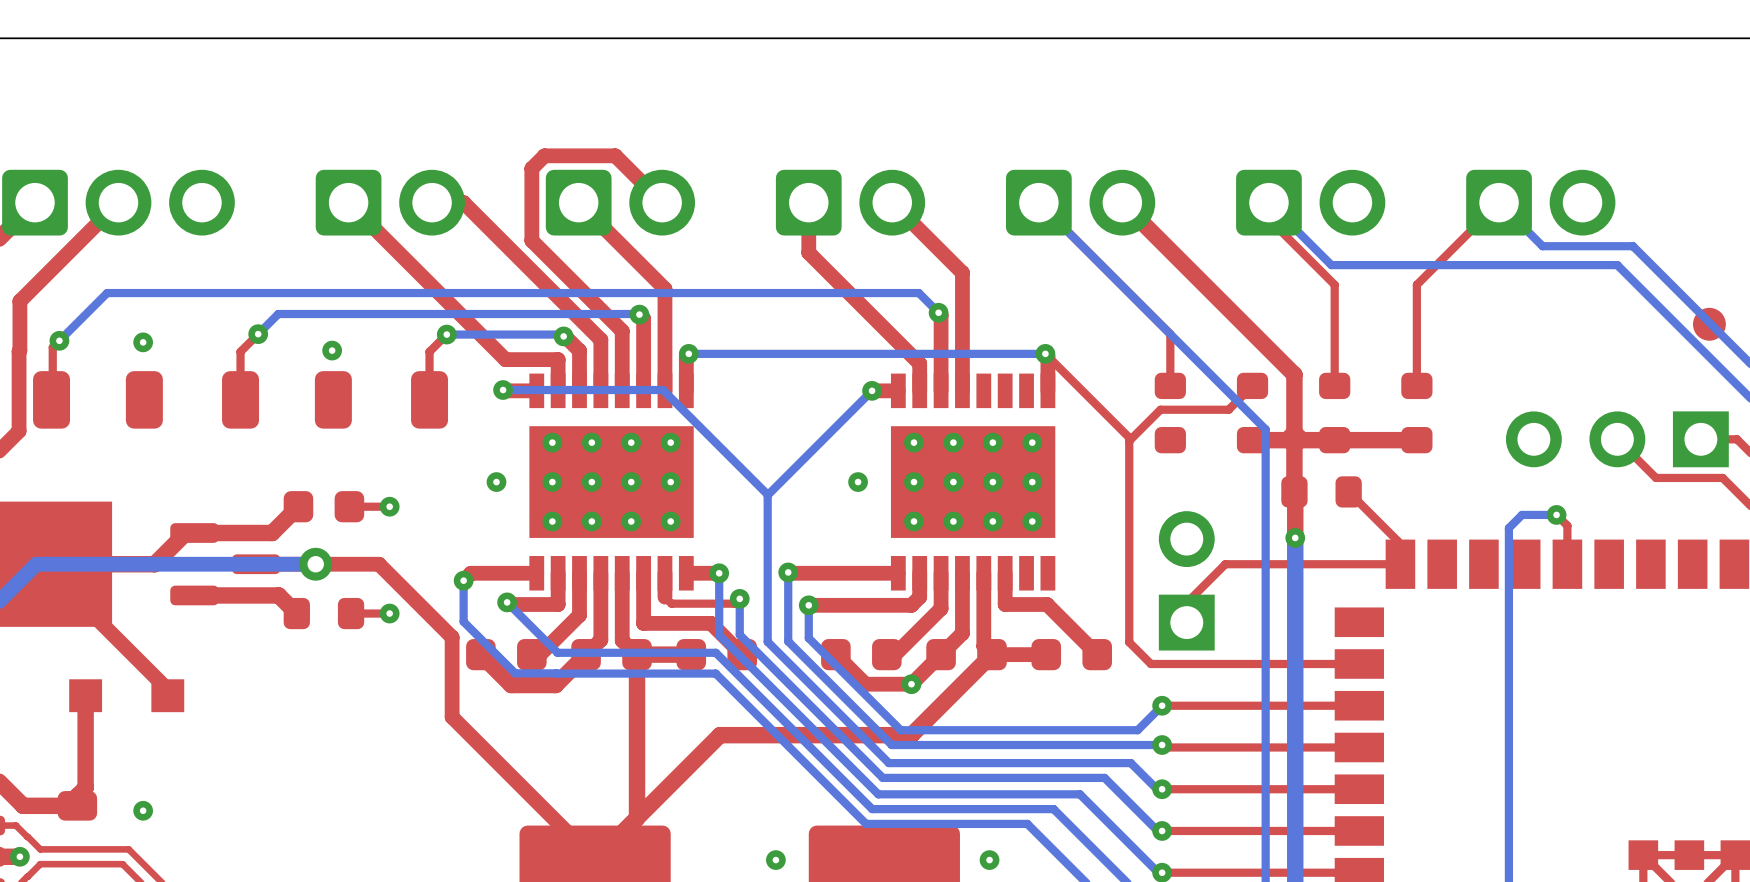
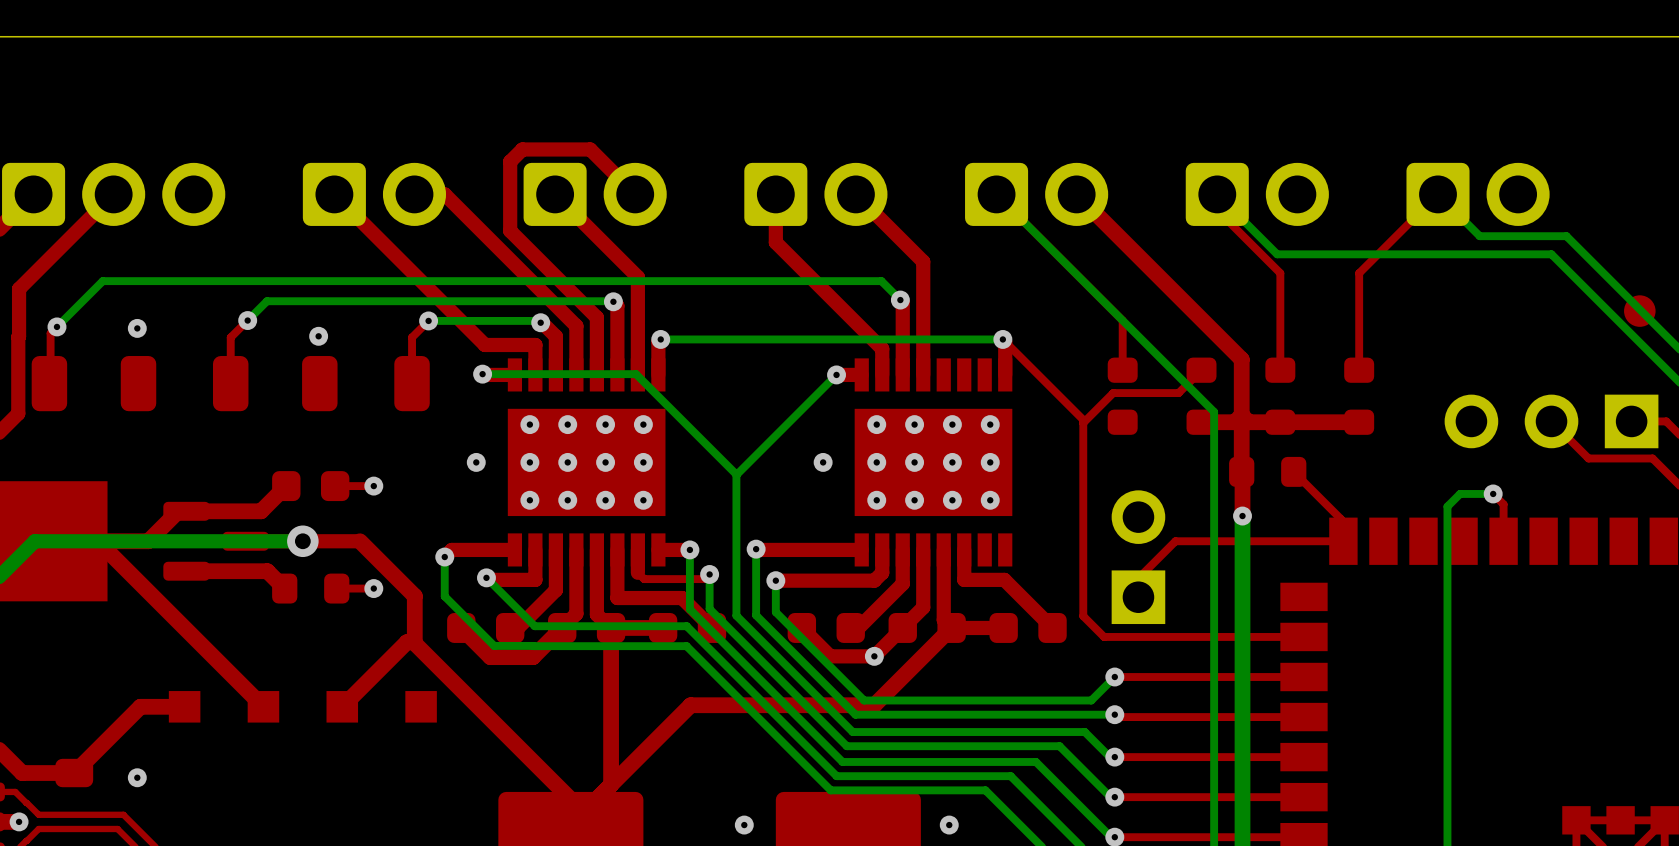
top track: (42, 564) (167, 689) -> none
top track: none -> (97, 541) (263, 706)
top track: (375, 564) (379, 564) (452, 637) (452, 717) (595, 860) -> (342, 706) (406, 642) (413, 642) (570, 799) (570, 825)
top track: none -> (359, 541) (414, 596) (414, 643)
part: (85, 695) -> none
part position: (167, 695) -> (184, 706)
top track: (85, 703) (85, 787) (77, 795) (77, 805) -> (184, 706) (140, 706) (74, 773)
part: none -> (263, 706)
part: none -> (342, 706)
part: none -> (421, 706)

